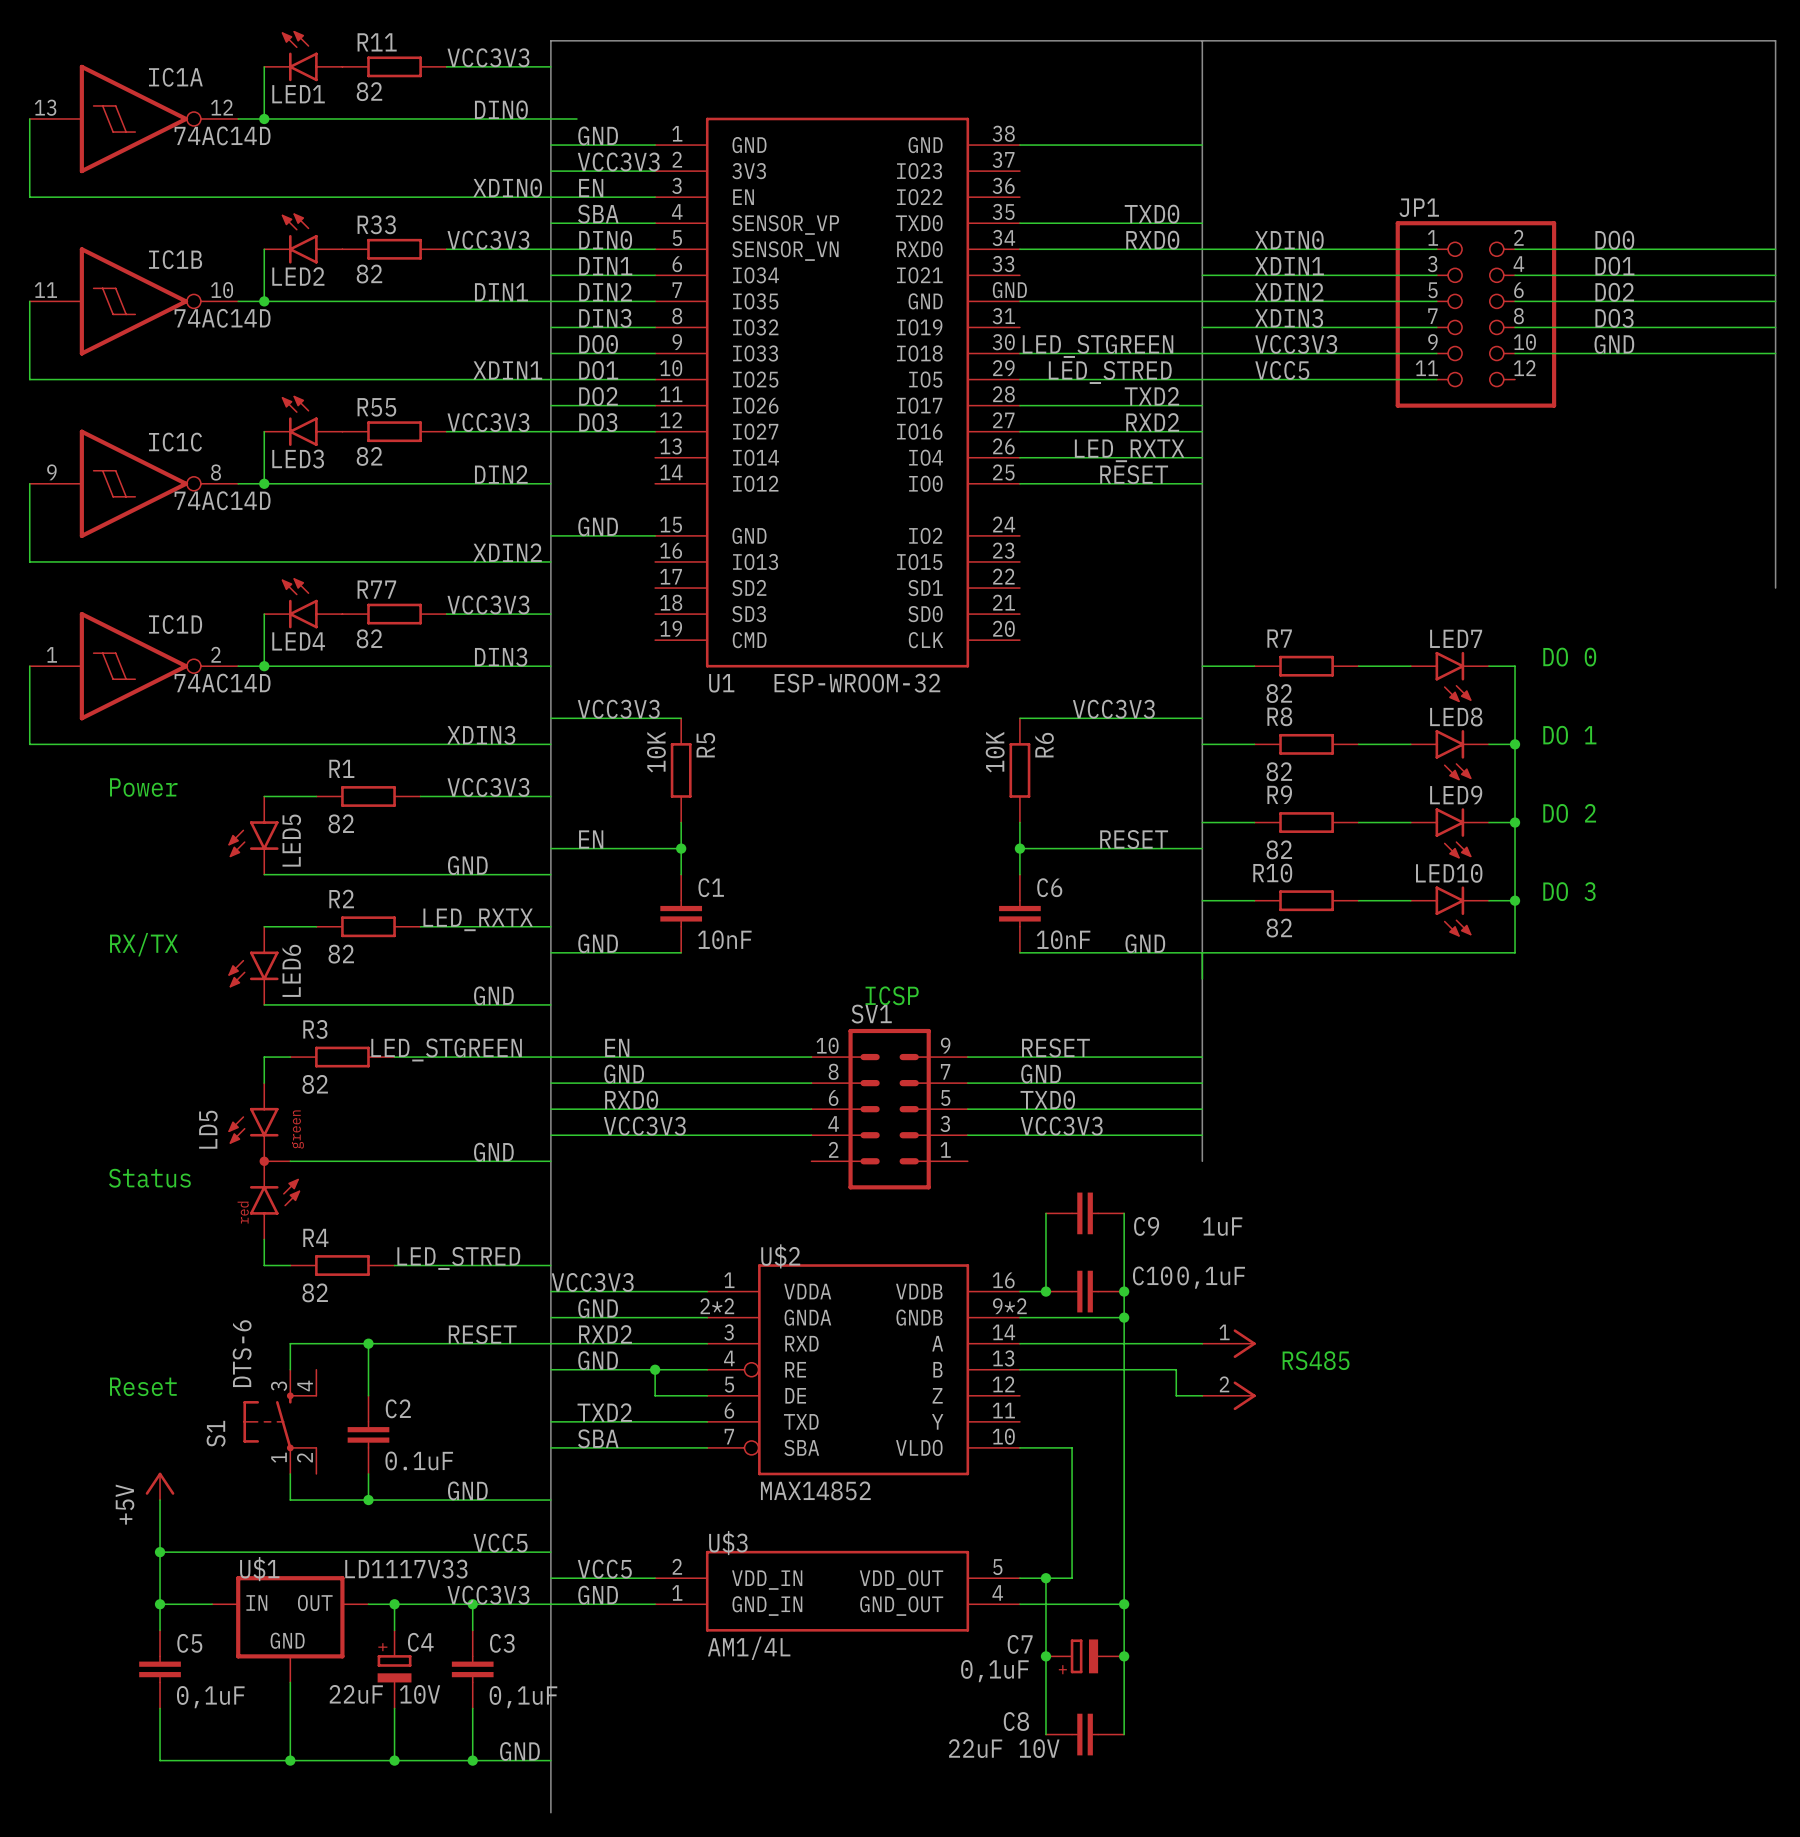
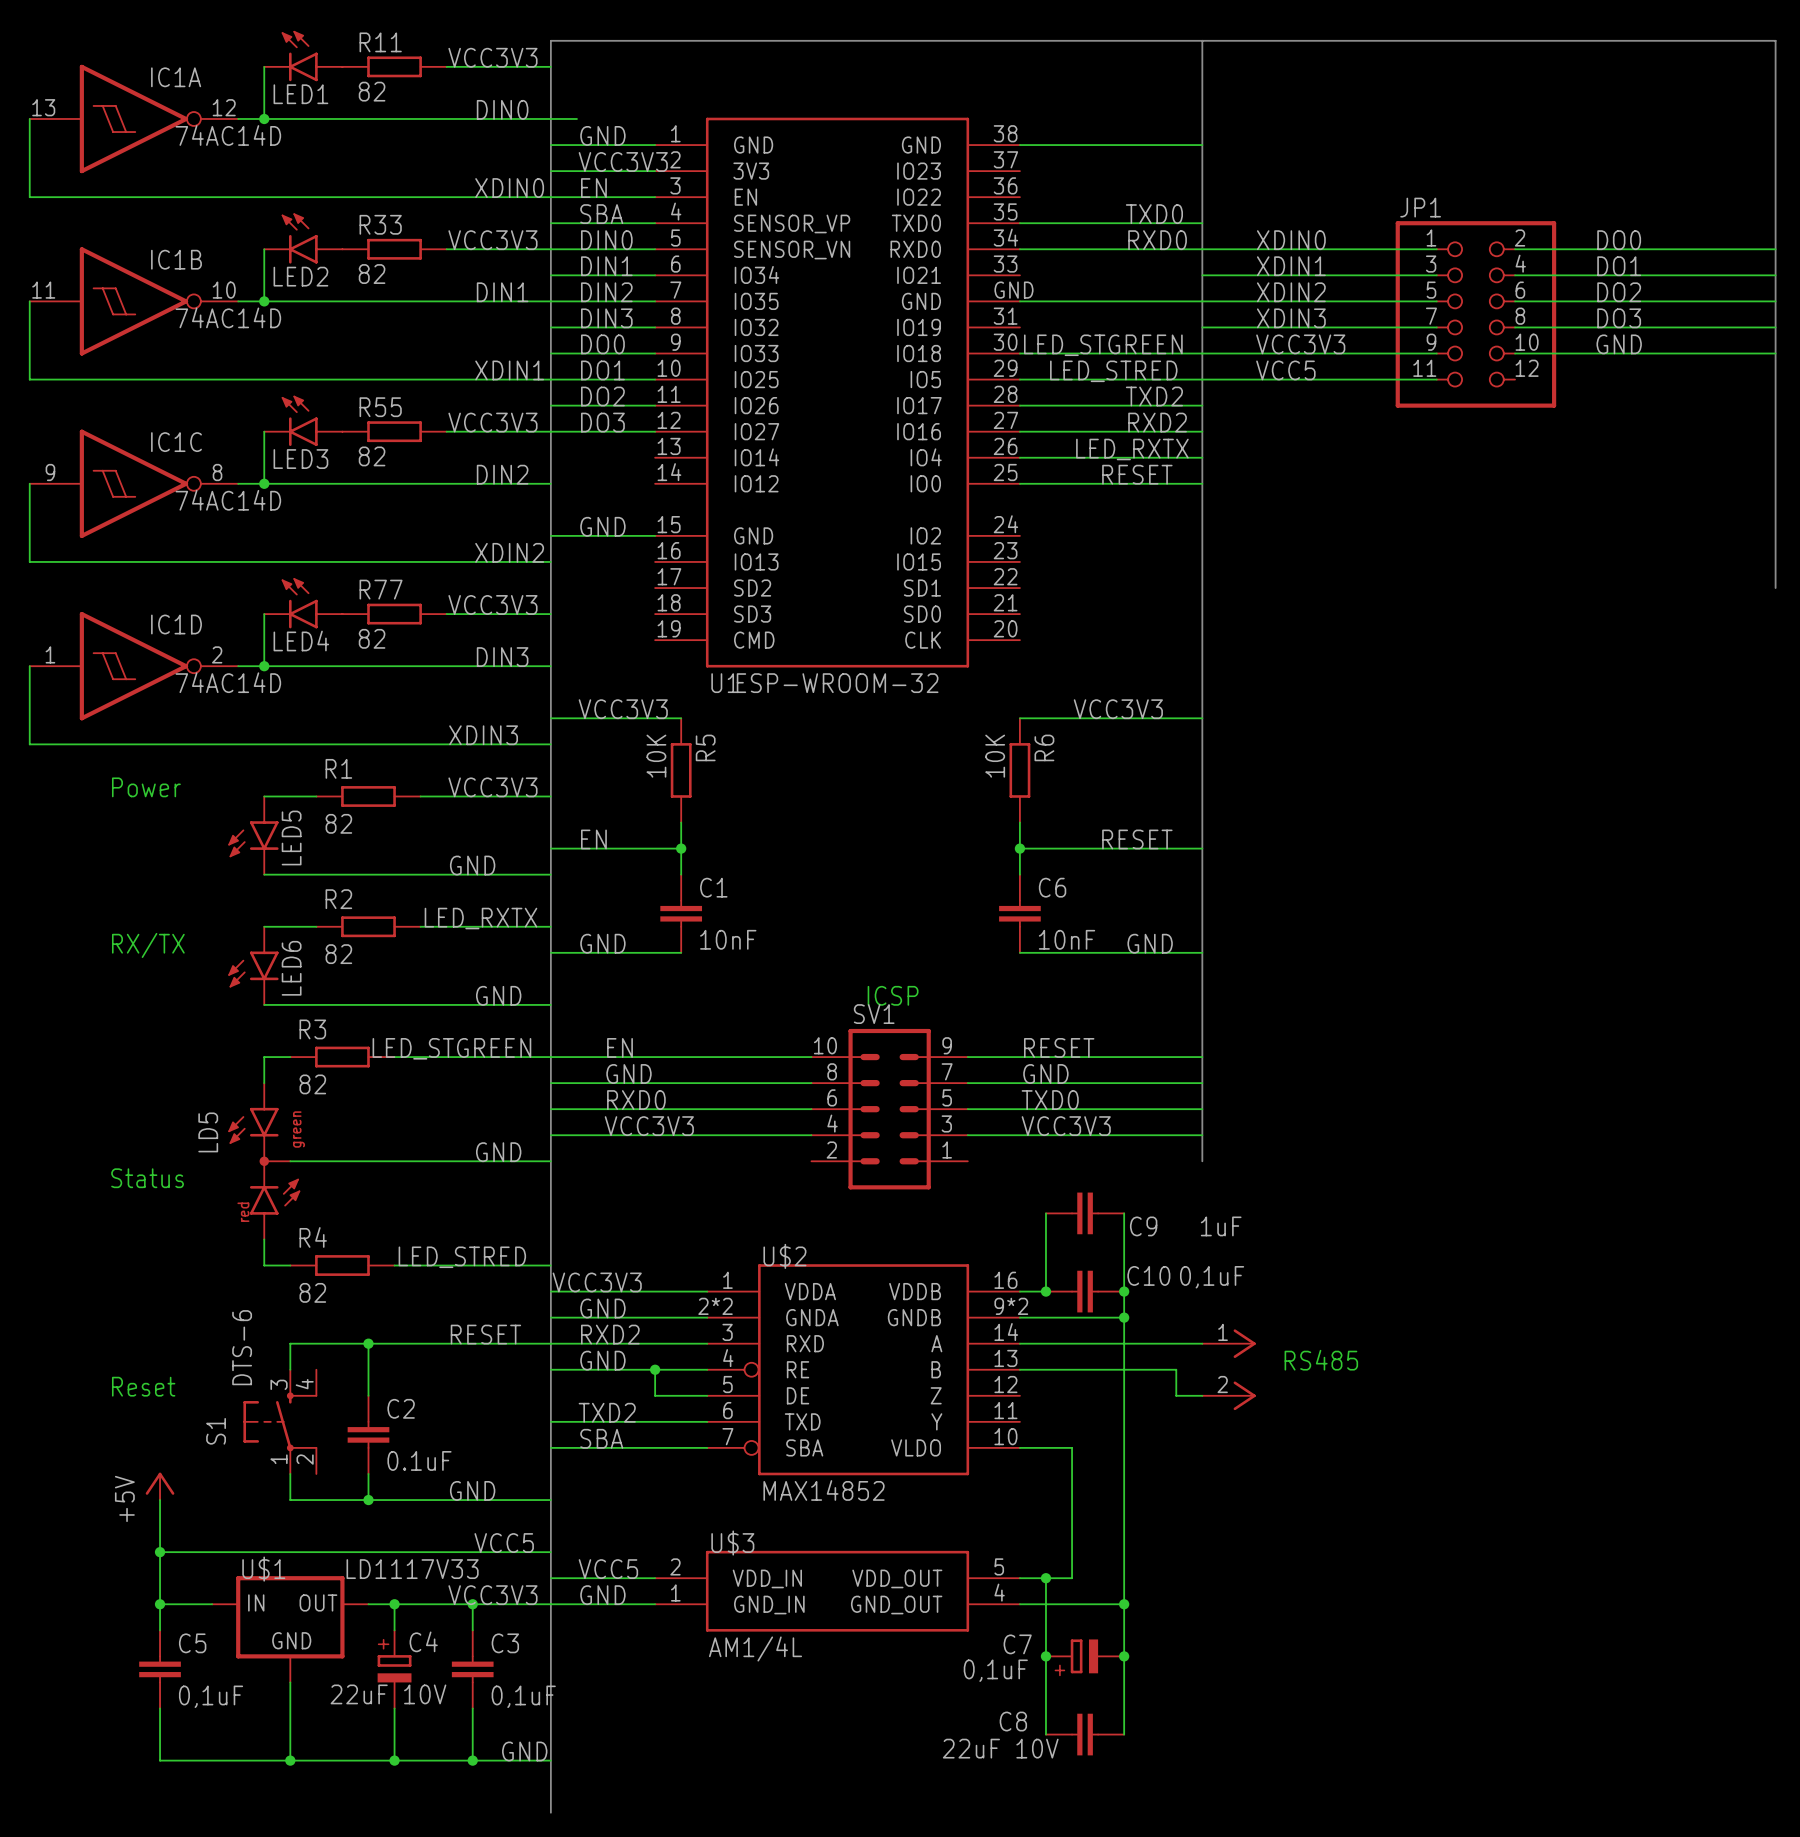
text: DO 0 (1569, 657) -> none
wire: (1202, 666) (1254, 666) -> none
R7: 82 (1306, 666) -> none
wire: (1358, 666) (1410, 666) -> none
wire: (1488, 666) (1515, 666) (1515, 952) (1202, 952) (1202, 978) -> none
LED7: (1449, 677) -> none
text: DO 1 (1569, 735) -> none
wire: (1202, 744) (1254, 744) -> none
R8: 82 (1306, 744) -> none
wire: (1358, 744) (1410, 744) -> none
wire: (1488, 744) (1515, 744) -> none
junction: (1515, 744) -> none
LED8: (1449, 755) -> none
text: DO 2 (1569, 813) -> none
wire: (1202, 822) (1254, 822) -> none
R9: 82 (1306, 822) -> none
wire: (1358, 822) (1410, 822) -> none
wire: (1488, 822) (1515, 822) -> none
junction: (1515, 822) -> none
LED9: (1449, 833) -> none
text: DO 3 (1569, 891) -> none
wire: (1202, 900) (1254, 900) -> none
R10: 82 (1306, 900) -> none
wire: (1358, 900) (1410, 900) -> none
wire: (1488, 900) (1515, 900) -> none
junction: (1515, 900) -> none
LED10: (1449, 911) -> none

